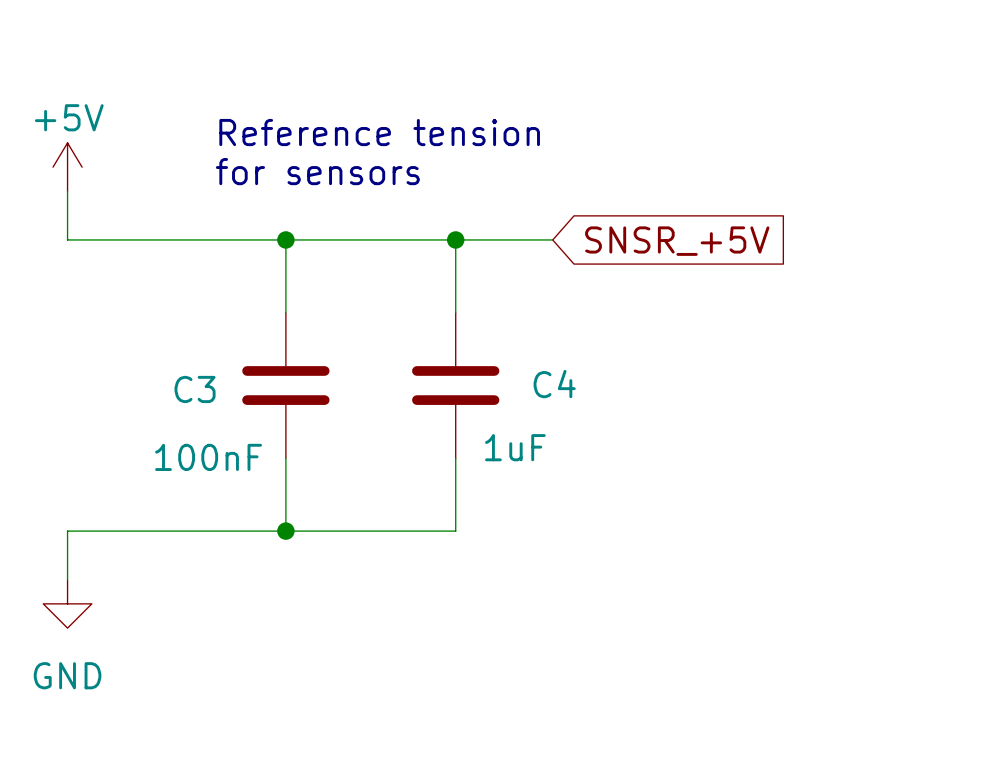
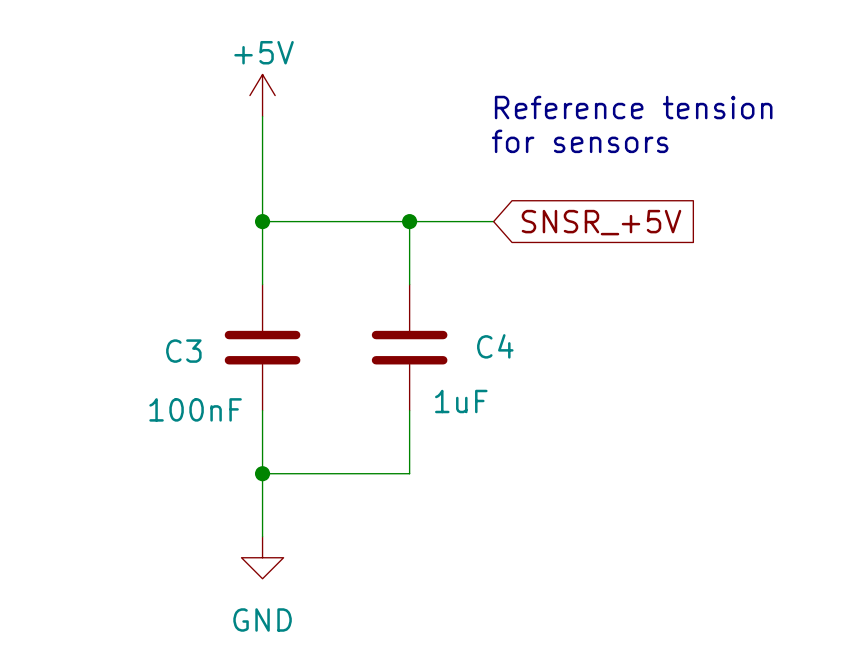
text position: Reference tension (379, 132) -> Reference tension (633, 107)
power symbol position: +5V (67, 167) -> +5V (262, 95)
text position: for sensors (317, 171) -> for sensors (580, 141)
wire: (67, 191) (67, 239) (285, 239) -> (262, 116) (262, 221)
wire: (285, 531) (67, 531) (67, 579) -> (262, 473) (262, 536)
power symbol position: GND (67, 603) -> GND (262, 557)

